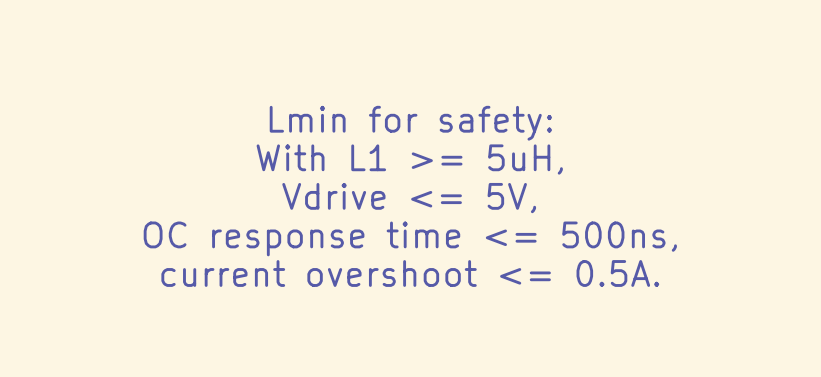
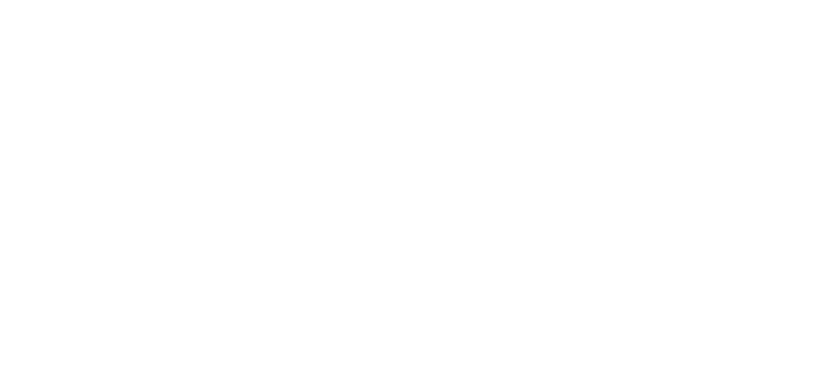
text: Lmin for safety: (410, 123) -> none
text: With L1 >= 5uH, (409, 159) -> none
text: Vdrive <= 5V, (409, 198) -> none
text: OC response time <= 500ns, (410, 238) -> none
text: current overshoot <= 0.5A. (410, 273) -> none

